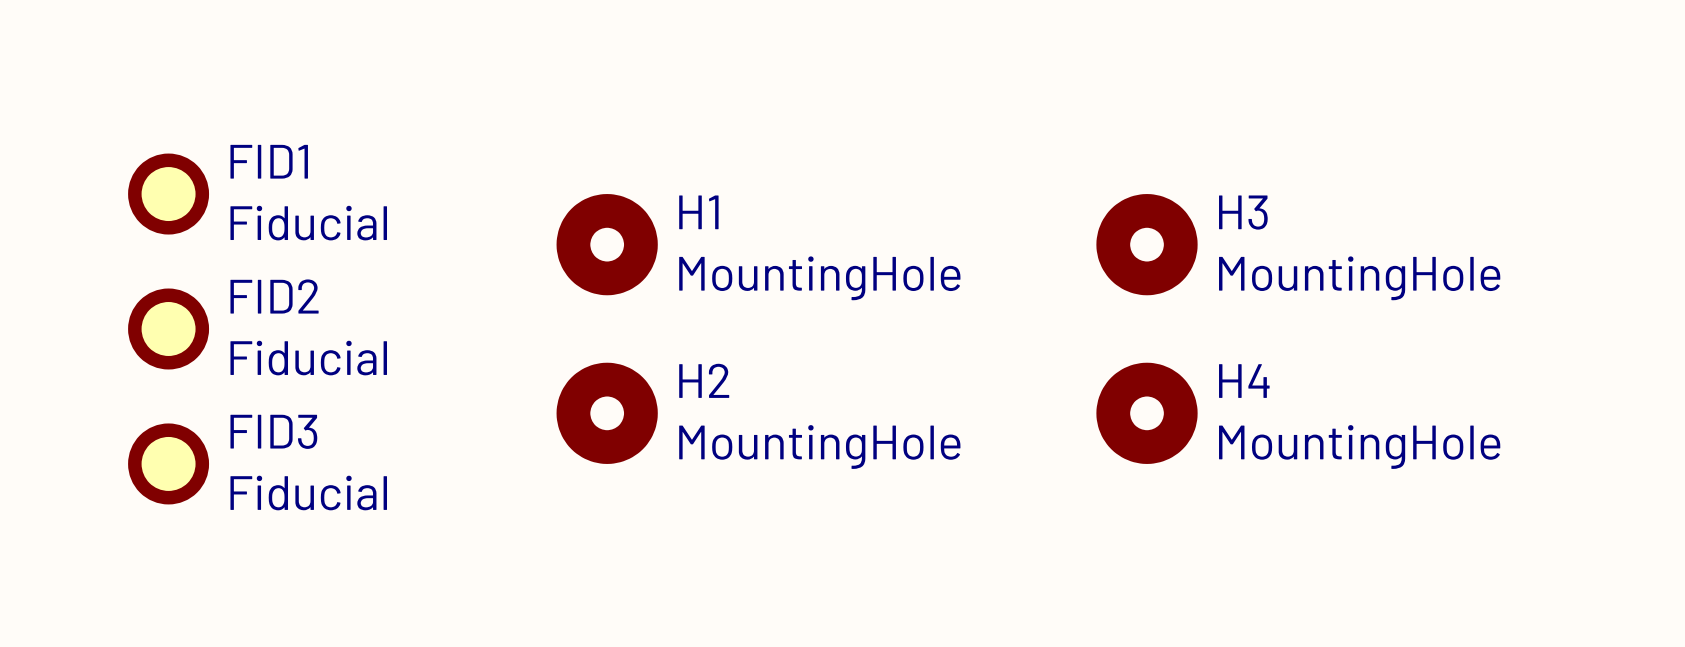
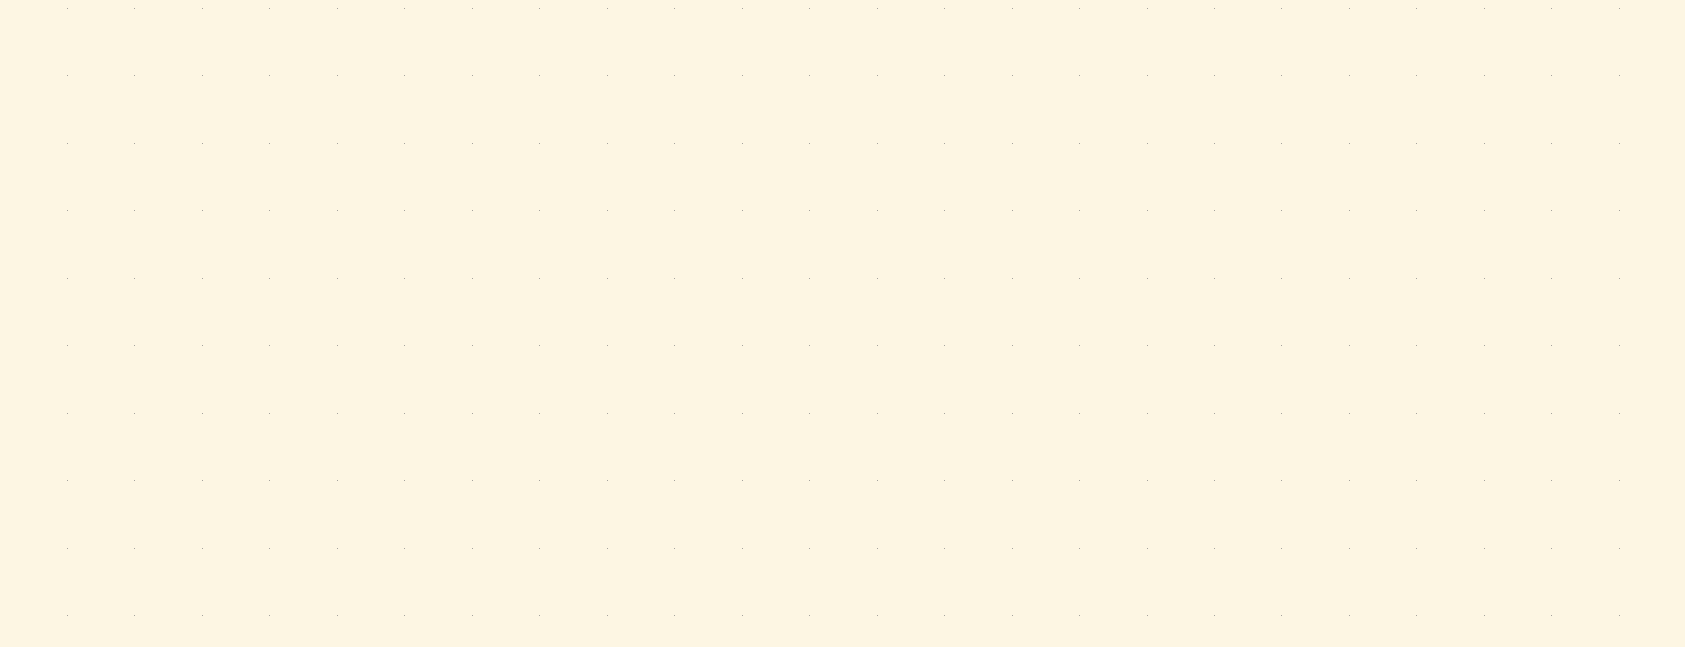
FID1: Fiducial (168, 194) -> none
H1: MountingHole (607, 244) -> none
H3: MountingHole (1147, 244) -> none
FID2: Fiducial (168, 328) -> none
H2: MountingHole (607, 413) -> none
H4: MountingHole (1147, 413) -> none
FID3: Fiducial (168, 463) -> none

